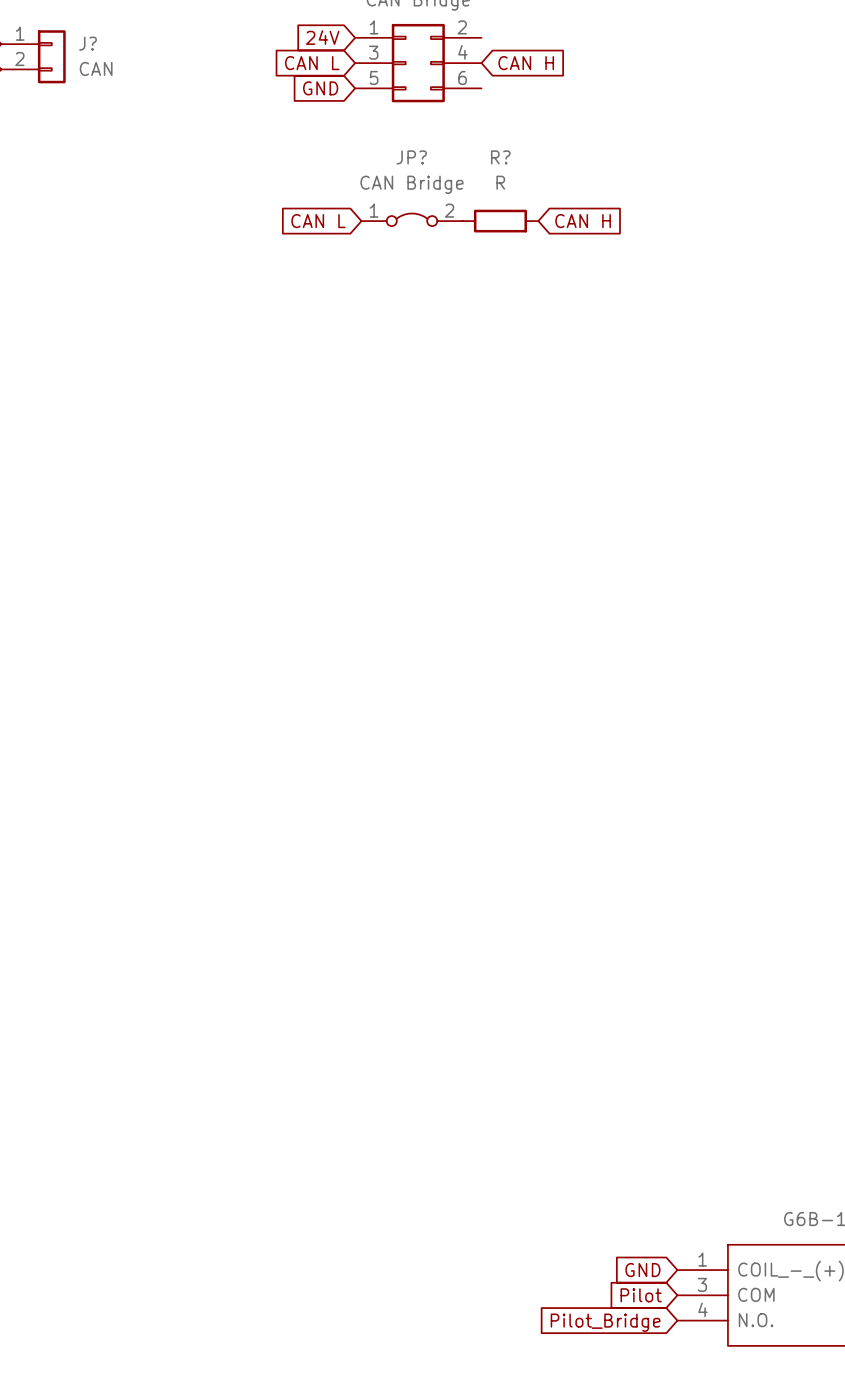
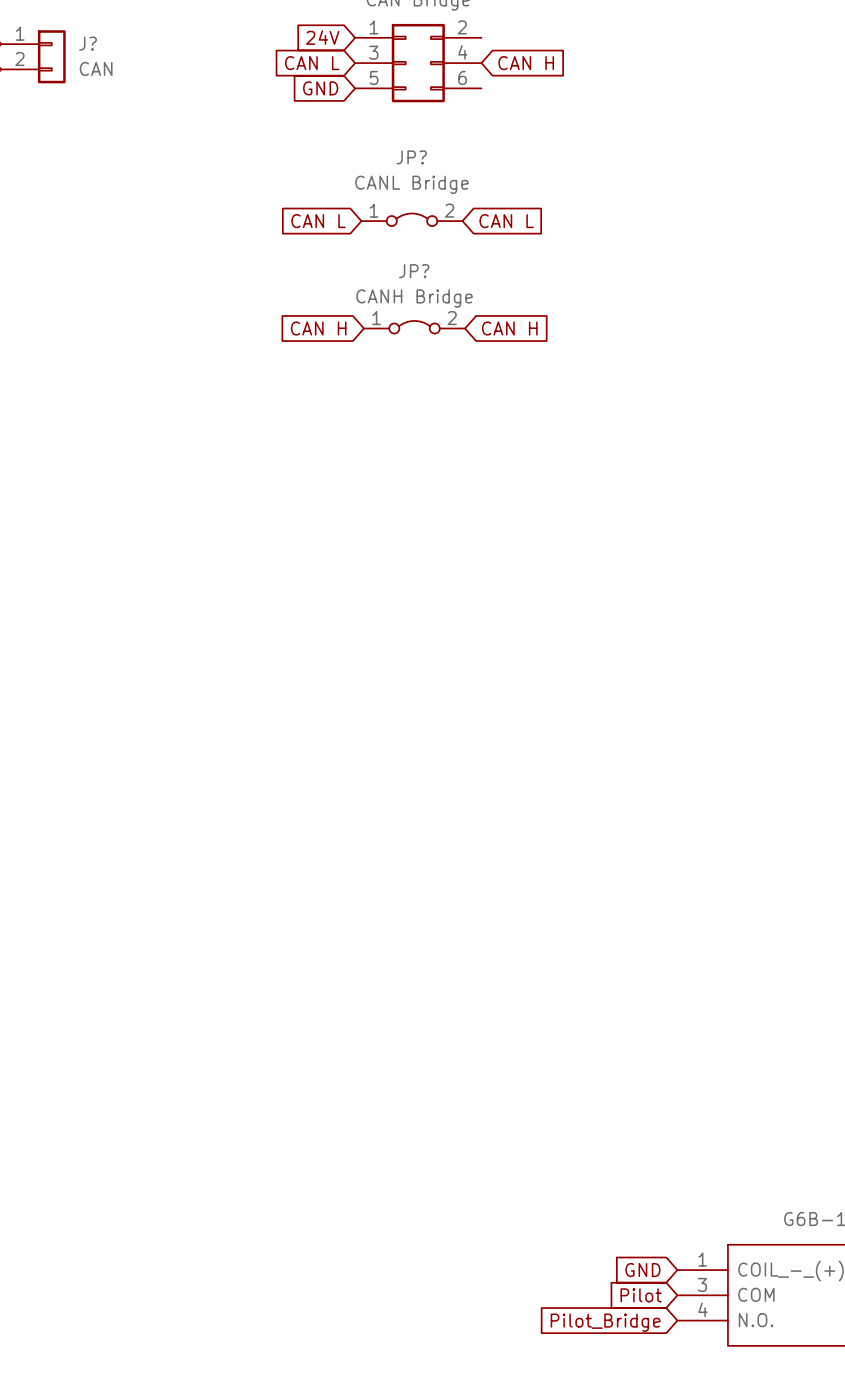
JP? value: CAN Bridge (411, 184) -> CANL Bridge (411, 184)
R?: R (500, 221) -> none
global label: CAN H (583, 221) -> CAN L (506, 221)
JP?: none -> CANH Bridge (414, 327)
global label: none -> CAN H (318, 328)
global label: none -> CAN H (509, 328)

